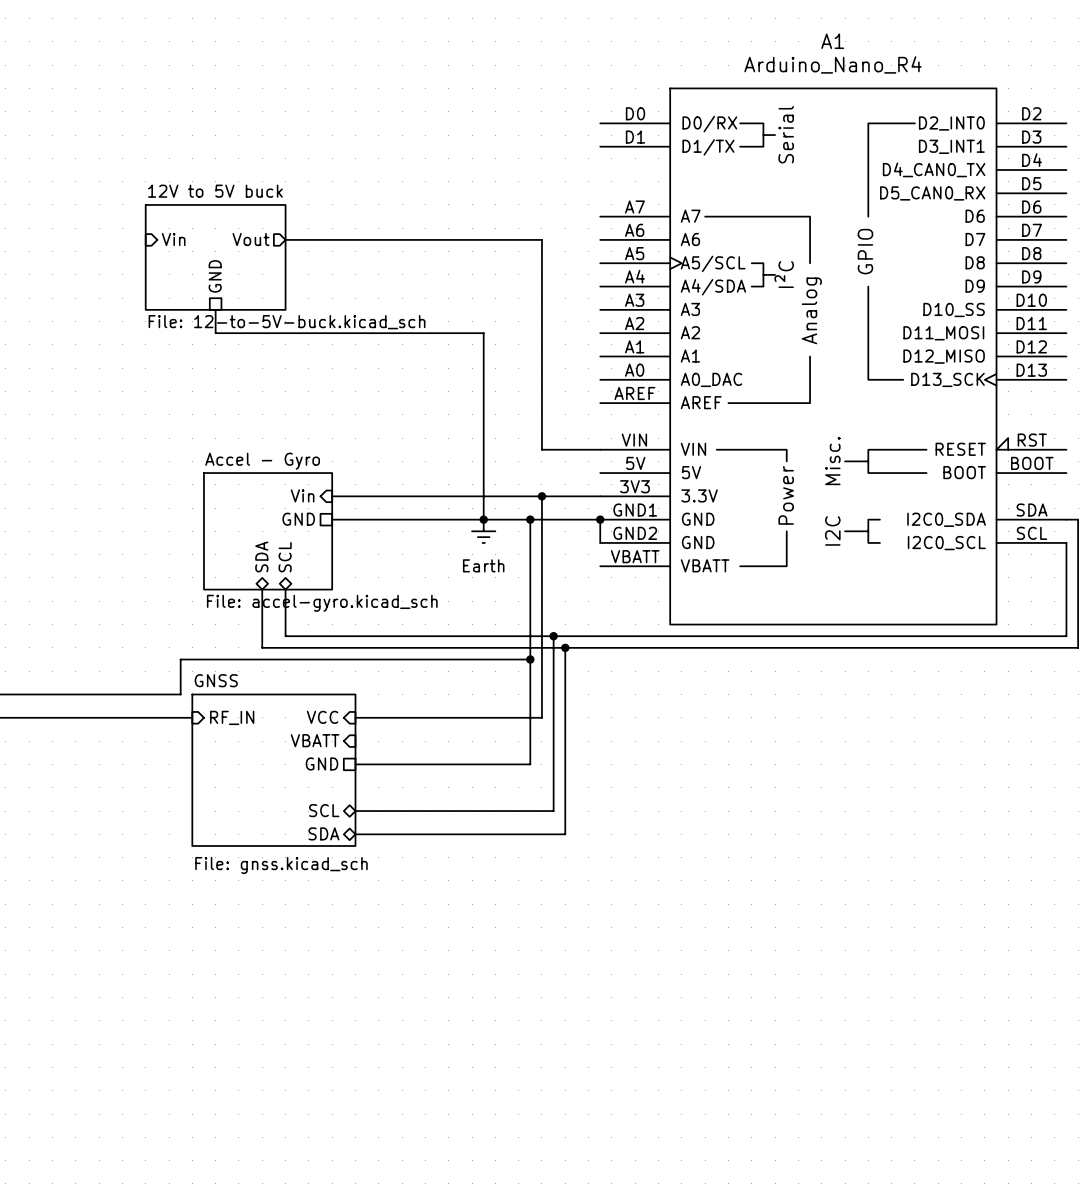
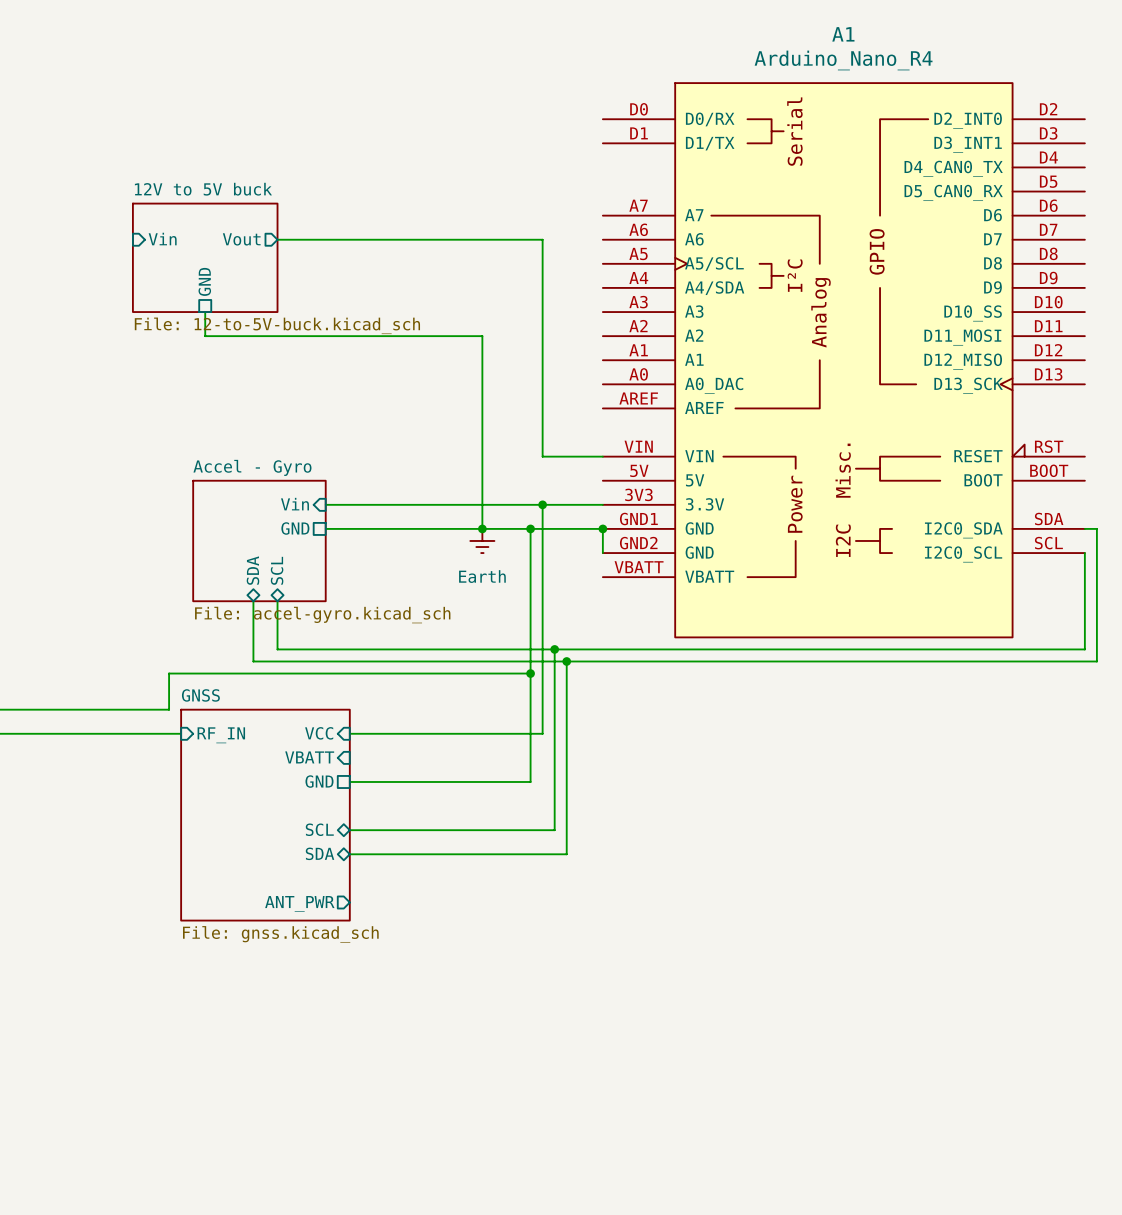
sheet GNSS: File: gnss.kicad_sch (273, 770) -> none
sheet GNSS: none -> File: gnss.kicad_sch (265, 815)
sheet pin: none -> ANT_PWR (299, 903)

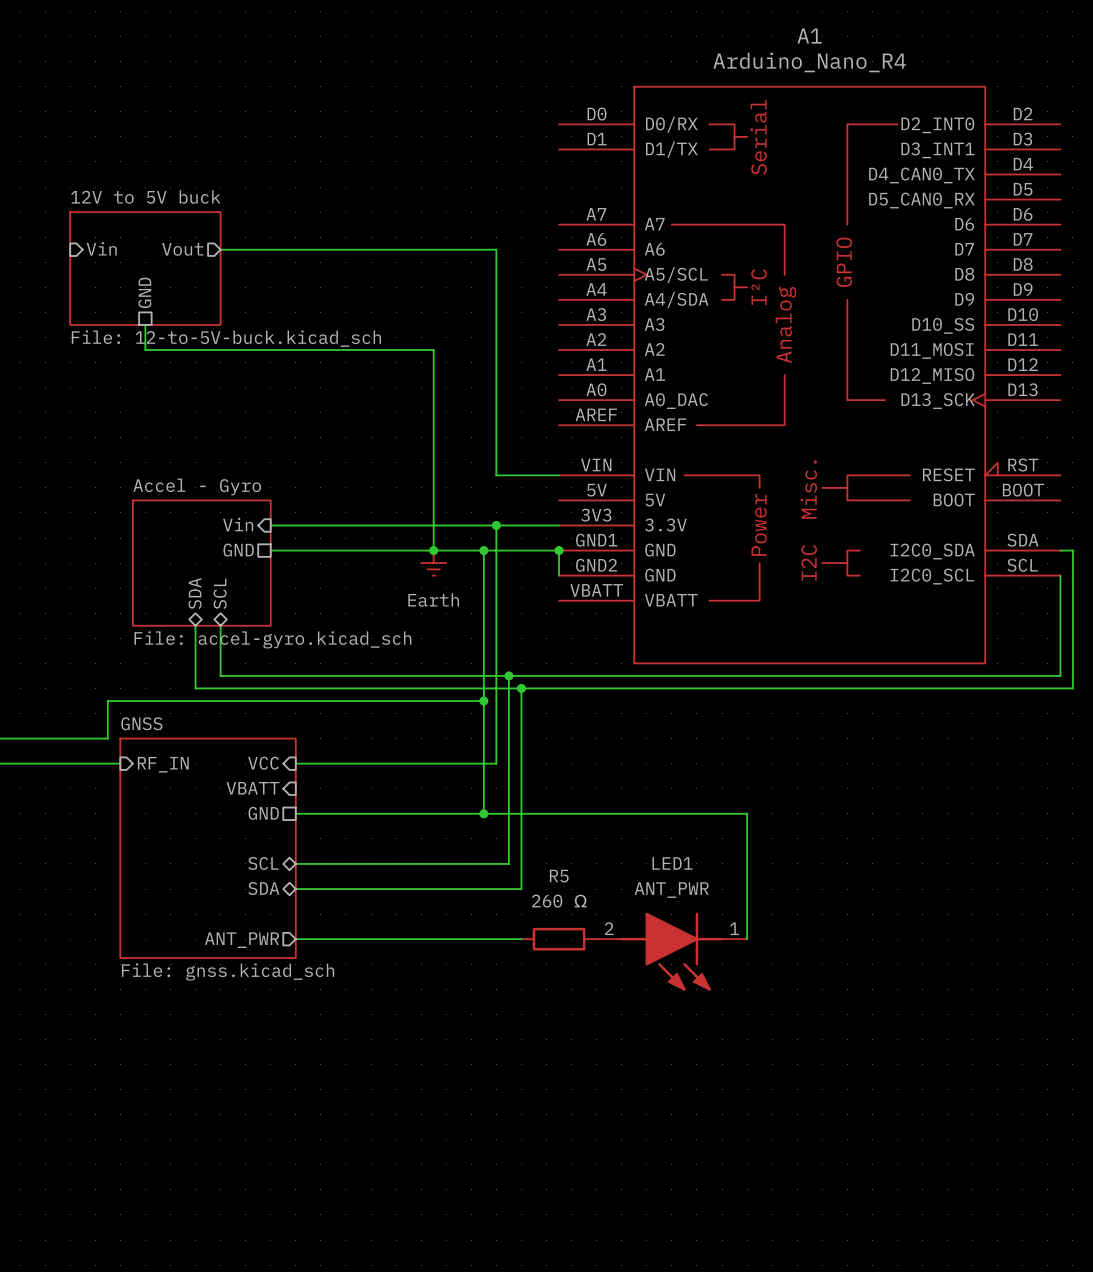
wire: none -> (483, 813) (747, 813) (747, 939)
junction: none -> (483, 813)
wire: none -> (295, 939) (521, 939)
R5: none -> 260 Ω (559, 939)
LED1: none -> ANT_PWR (671, 951)

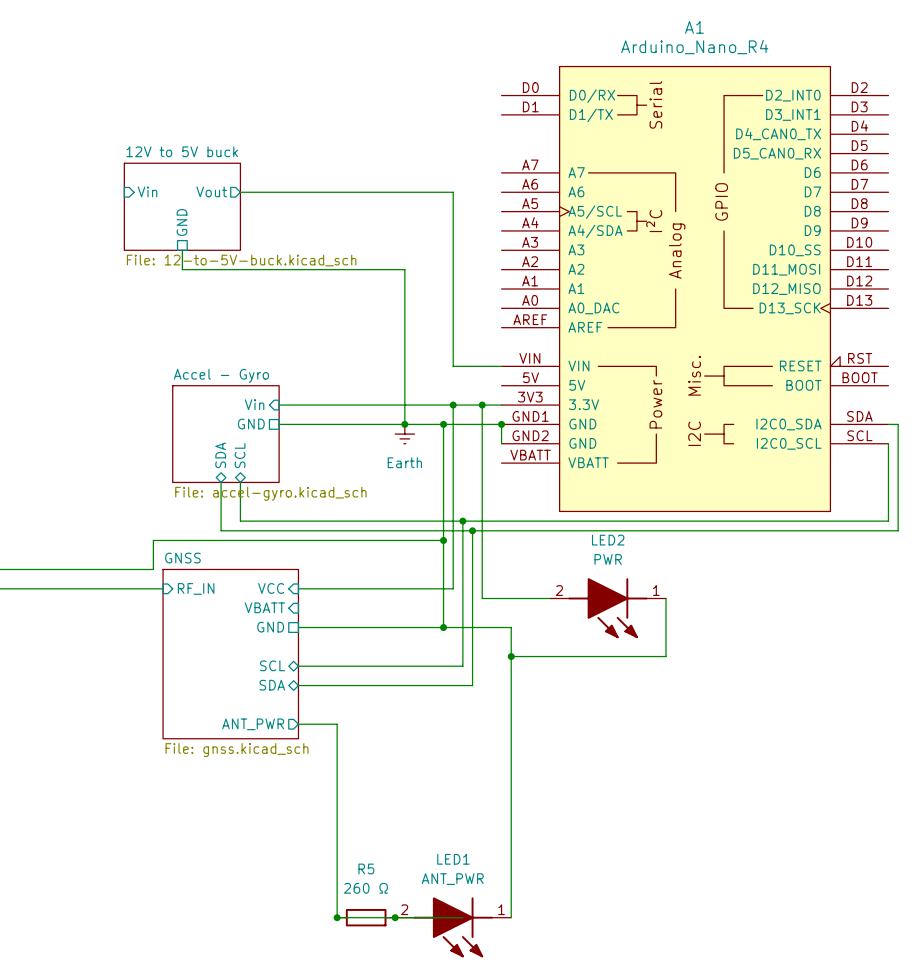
wire: none -> (482, 405) (482, 598) (549, 598)
junction: none -> (482, 405)
wire: none -> (666, 598) (666, 656) (511, 656)
LED2: none -> PWR (607, 608)
wire: (571, 813) (747, 813) (747, 939) -> (511, 627) (511, 917)
junction: none -> (511, 656)
wire: (345, 939) (521, 939) -> (337, 724) (337, 917) (462, 917)
R5 position: (559, 939) -> (366, 917)
LED1 position: (671, 951) -> (453, 927)
junction: none -> (337, 917)
junction: none -> (395, 917)

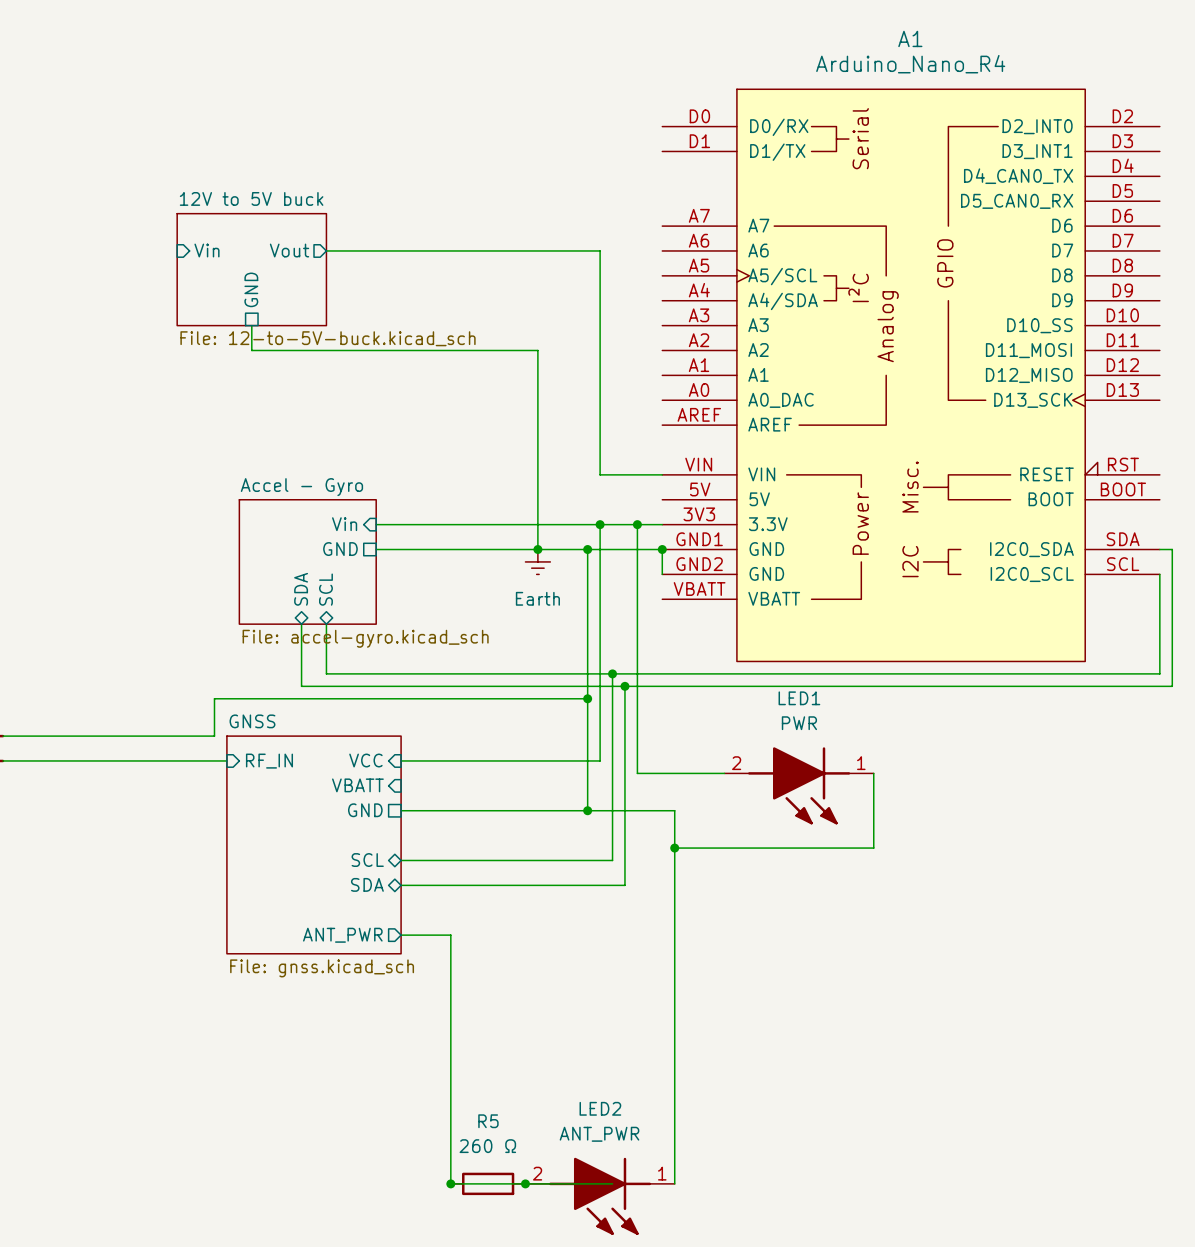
LED2 name: LED2 (608, 540) -> LED1 (799, 698)
LED1 name: LED1 (453, 859) -> LED2 (600, 1108)

